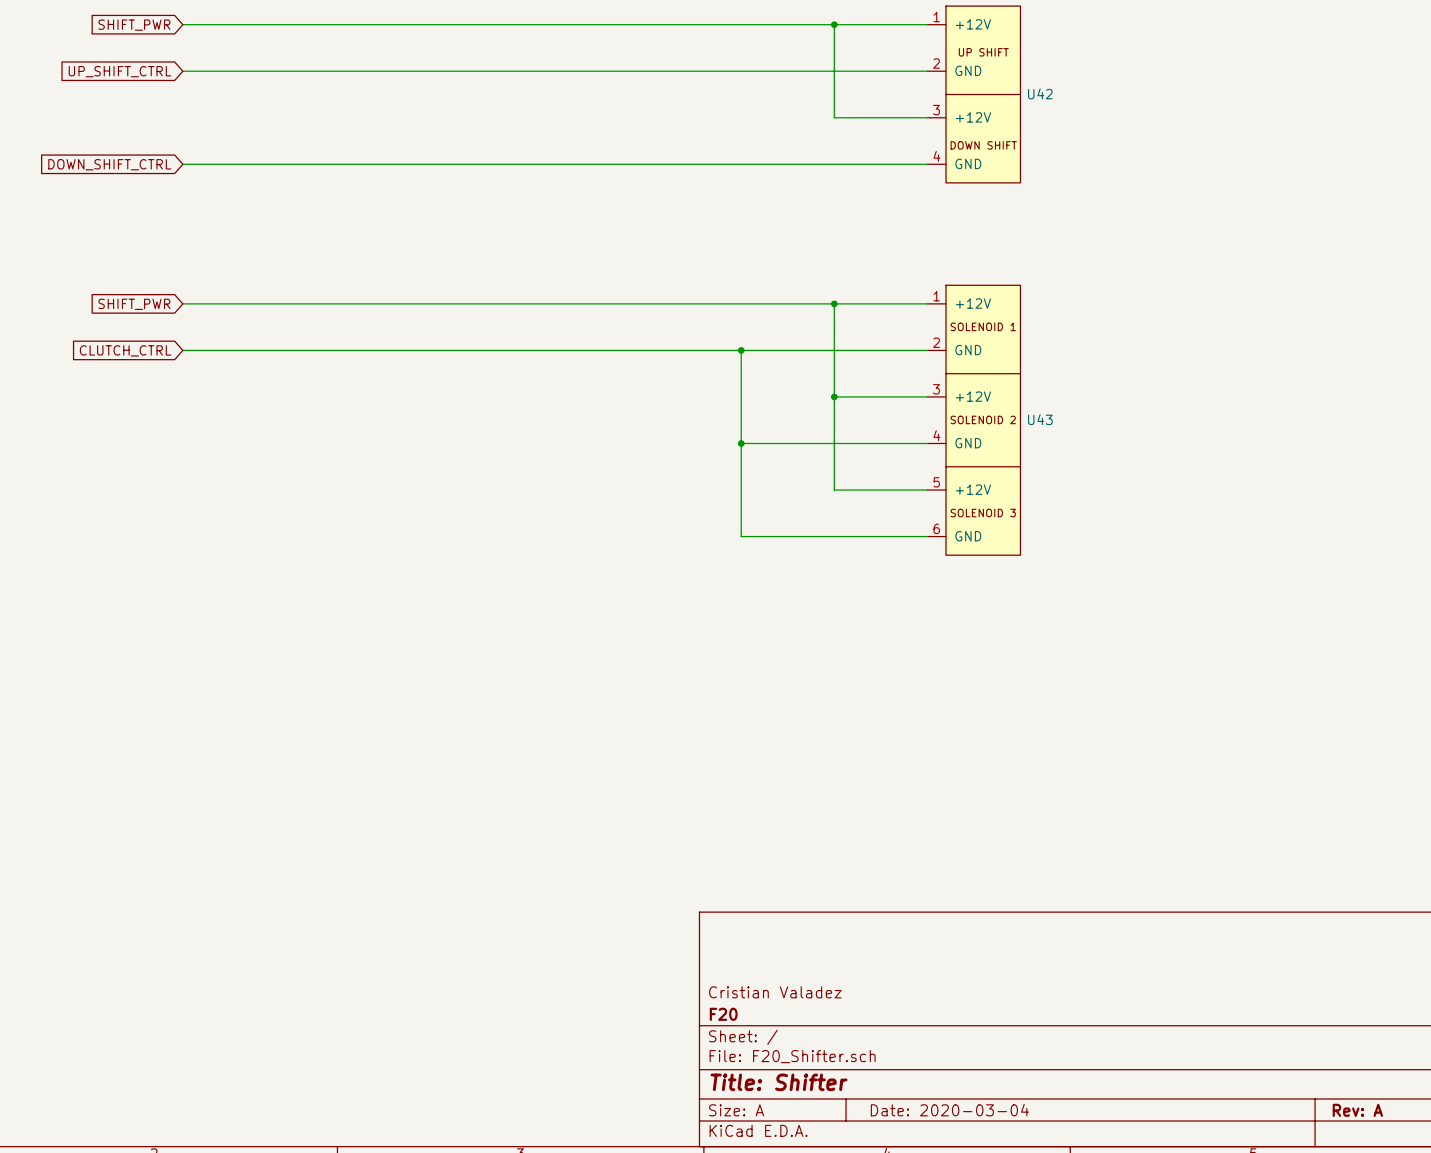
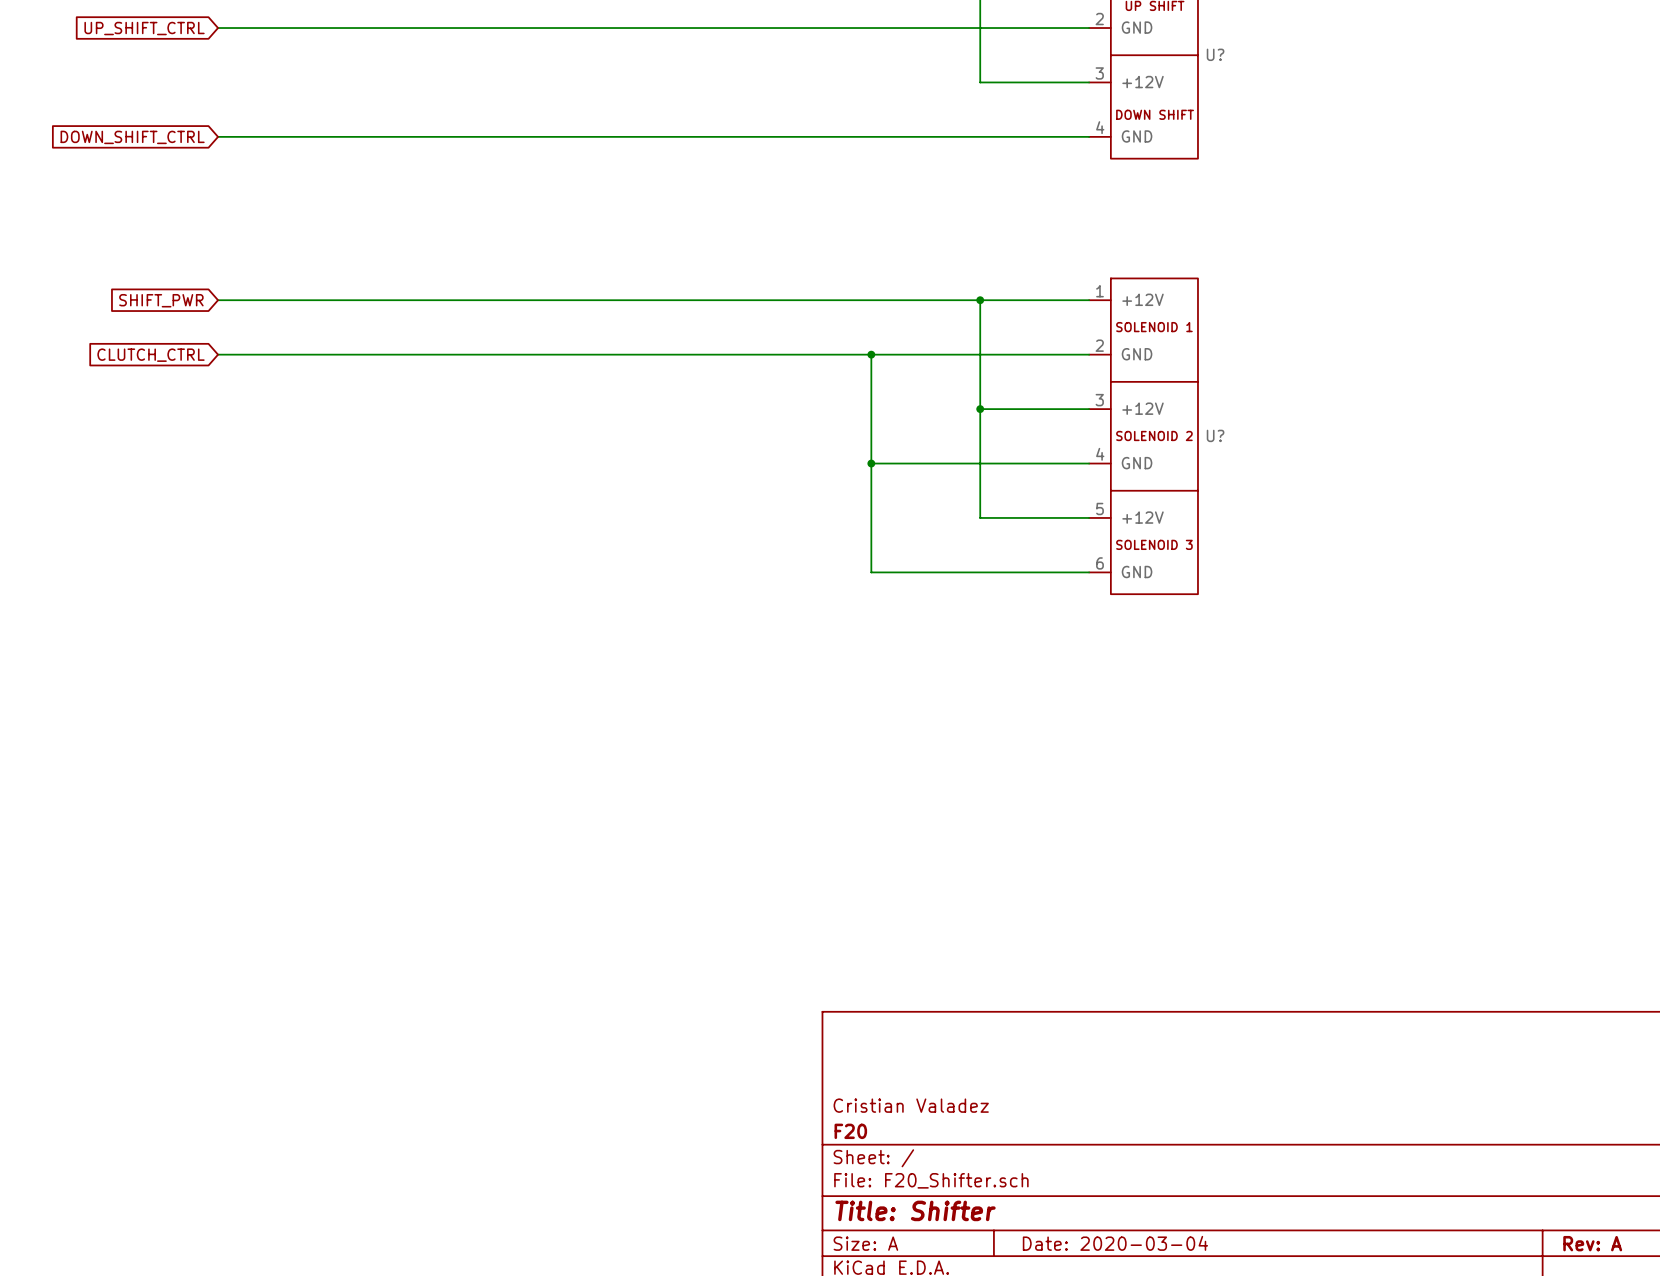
U42 name: U42 (1040, 93) -> U? (1215, 54)
U43 name: U43 (1040, 419) -> U? (1215, 435)

